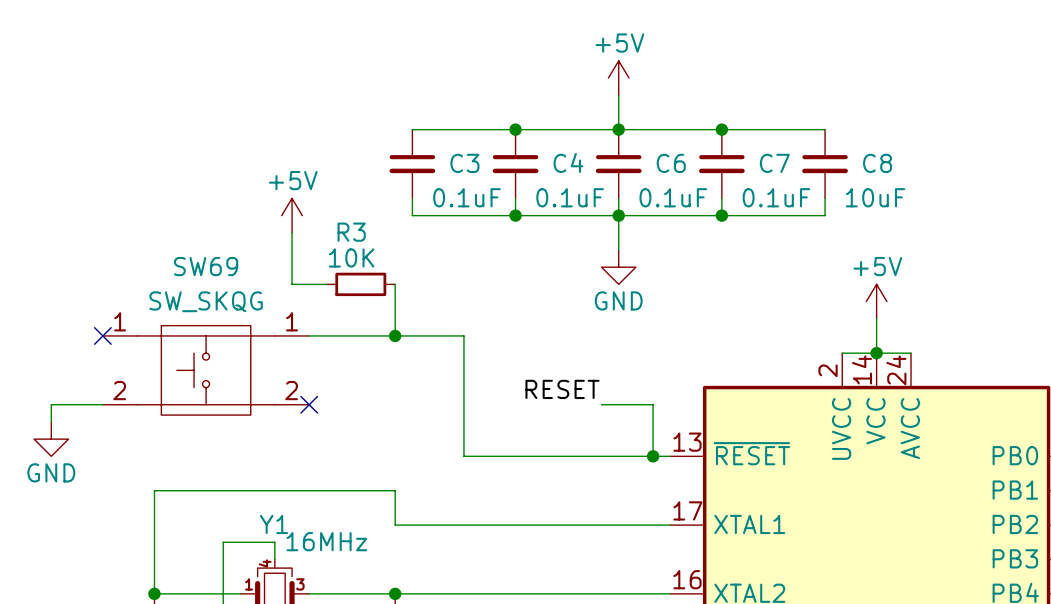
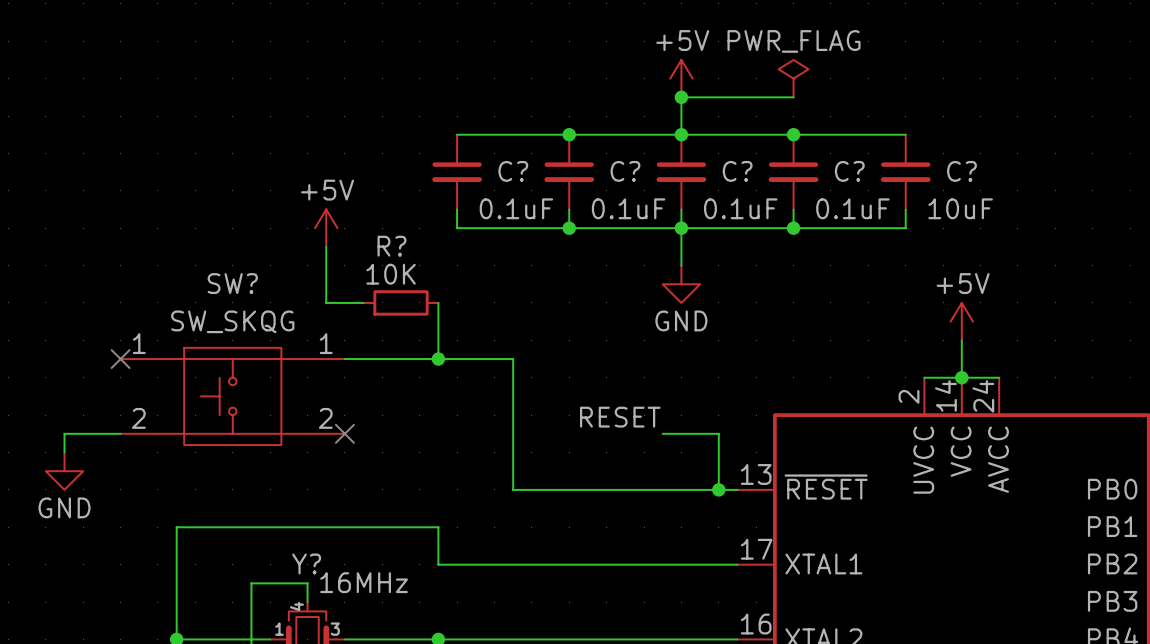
power symbol: none -> PWR_FLAG (793, 78)
wire: none -> (681, 97) (793, 97)
junction: none -> (681, 97)
C4 name: C4 (568, 162) -> C? (625, 171)
C3 name: C3 (464, 163) -> C? (513, 171)
C6 name: C6 (671, 163) -> C? (737, 171)
C7 name: C7 (774, 163) -> C? (849, 171)
C8 name: C8 (877, 163) -> C? (961, 171)
R3 name: R3 (351, 232) -> R? (391, 246)
SW69 name: SW69 (206, 266) -> SW? (232, 283)
Y1 name: Y1 (274, 524) -> Y? (306, 563)

